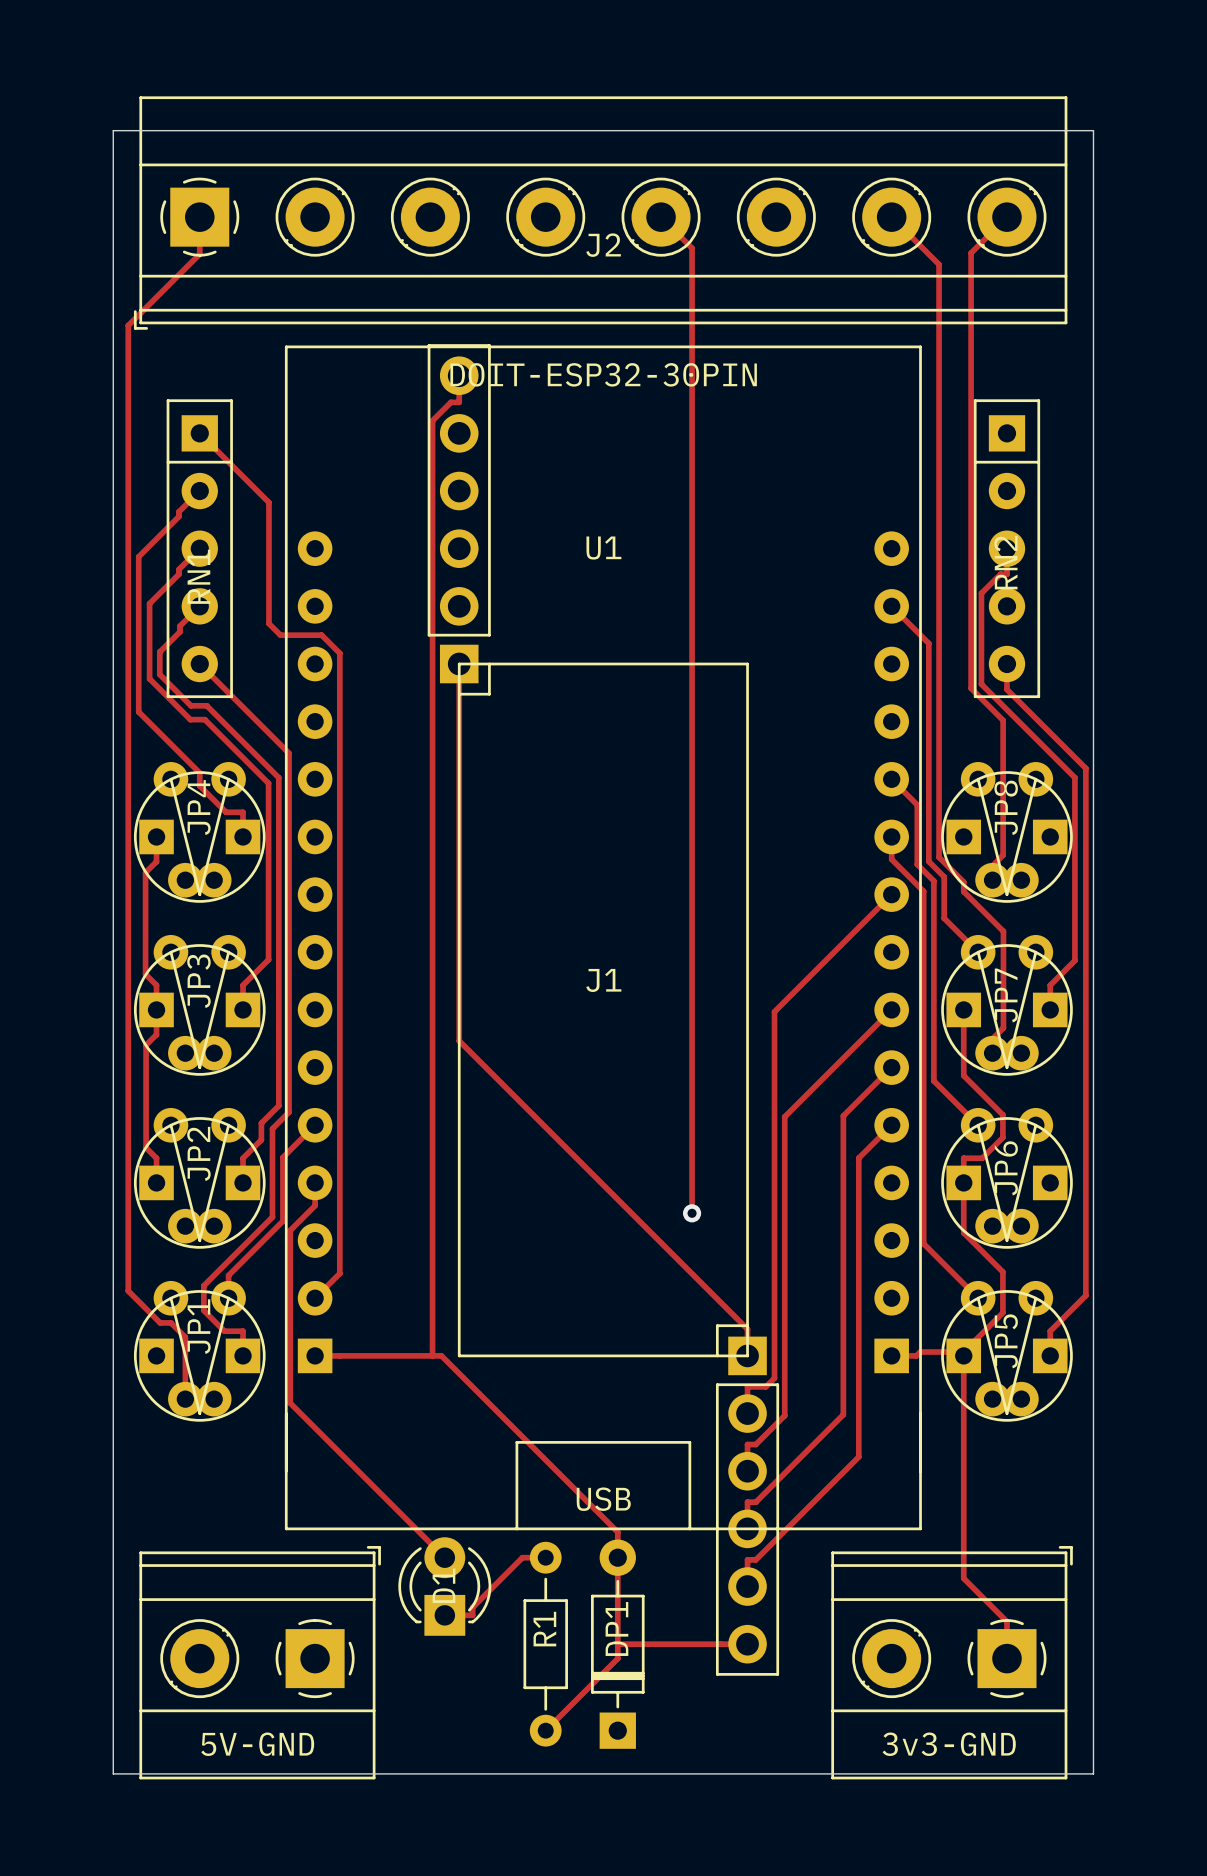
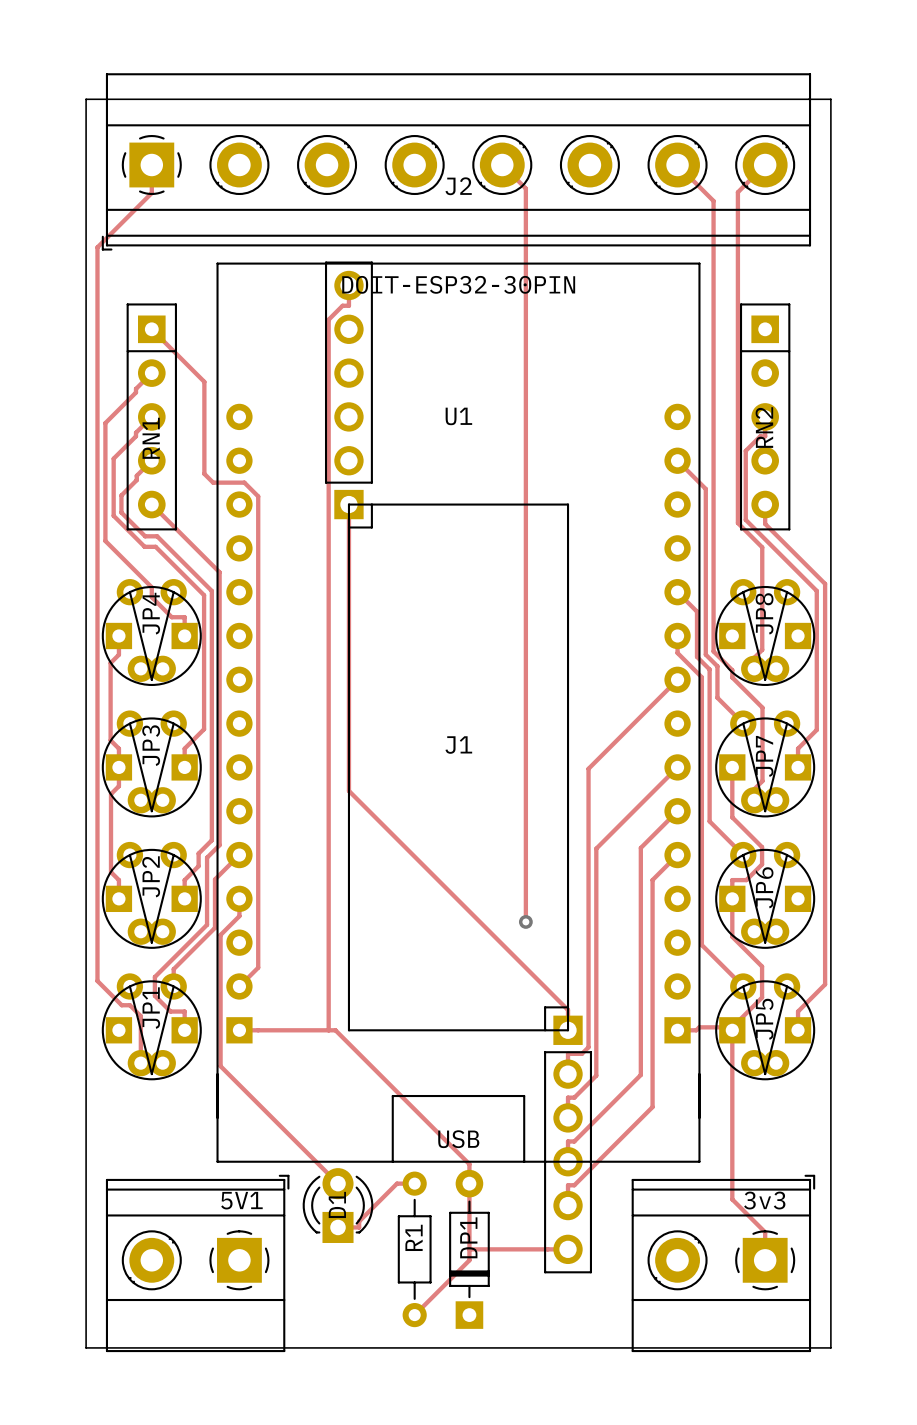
5V-GND name: 5V-GND (257, 1744) -> 5V1 (241, 1200)
3v3-GND name: 3v3-GND (949, 1744) -> 3v3 (764, 1200)

